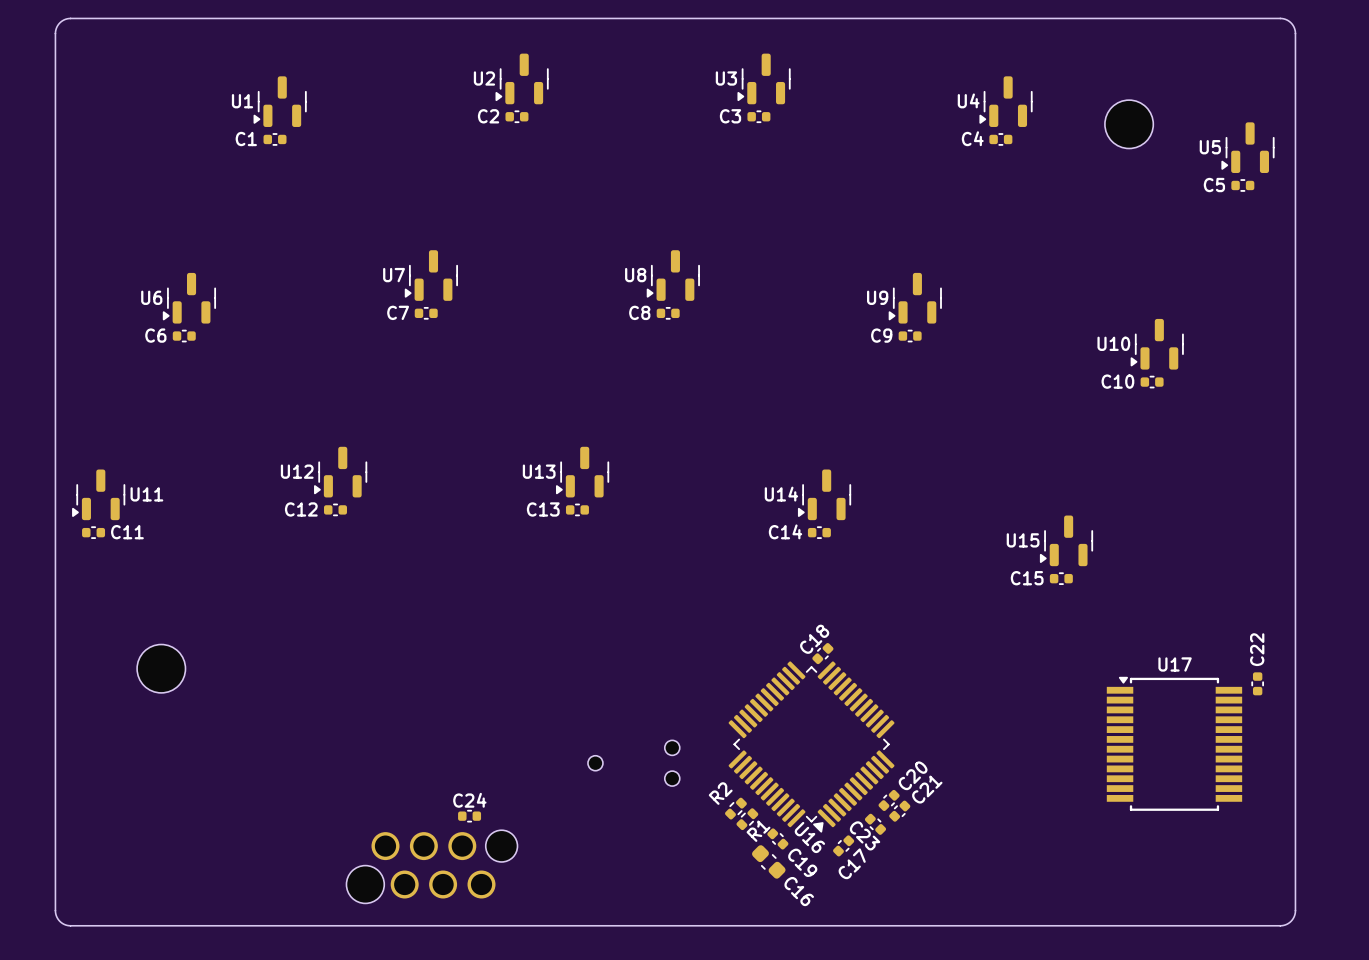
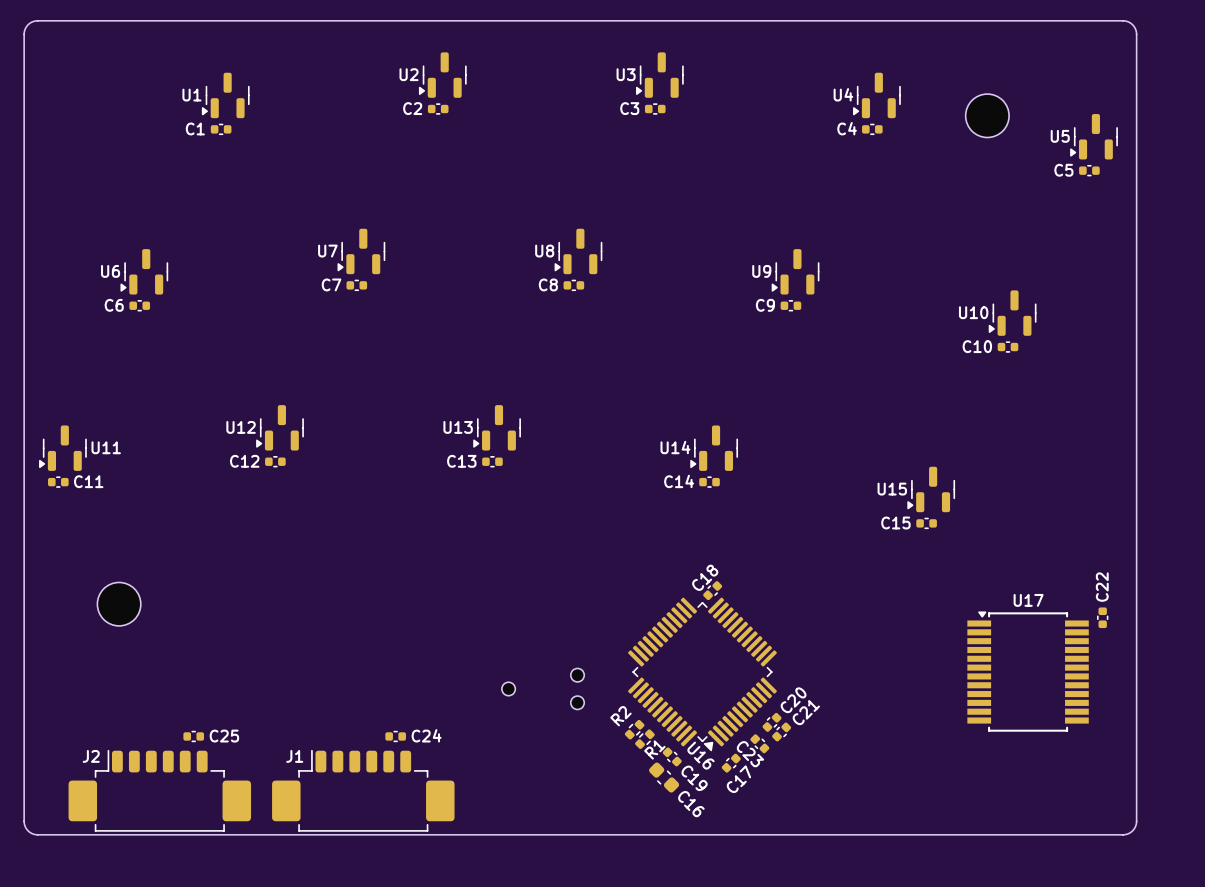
C24 name position: C24 (469, 800) -> C24 (426, 735)
C25: none -> (193, 736)
part: (431, 866) -> none
J2: none -> (159, 790)
J1: none -> (363, 790)

